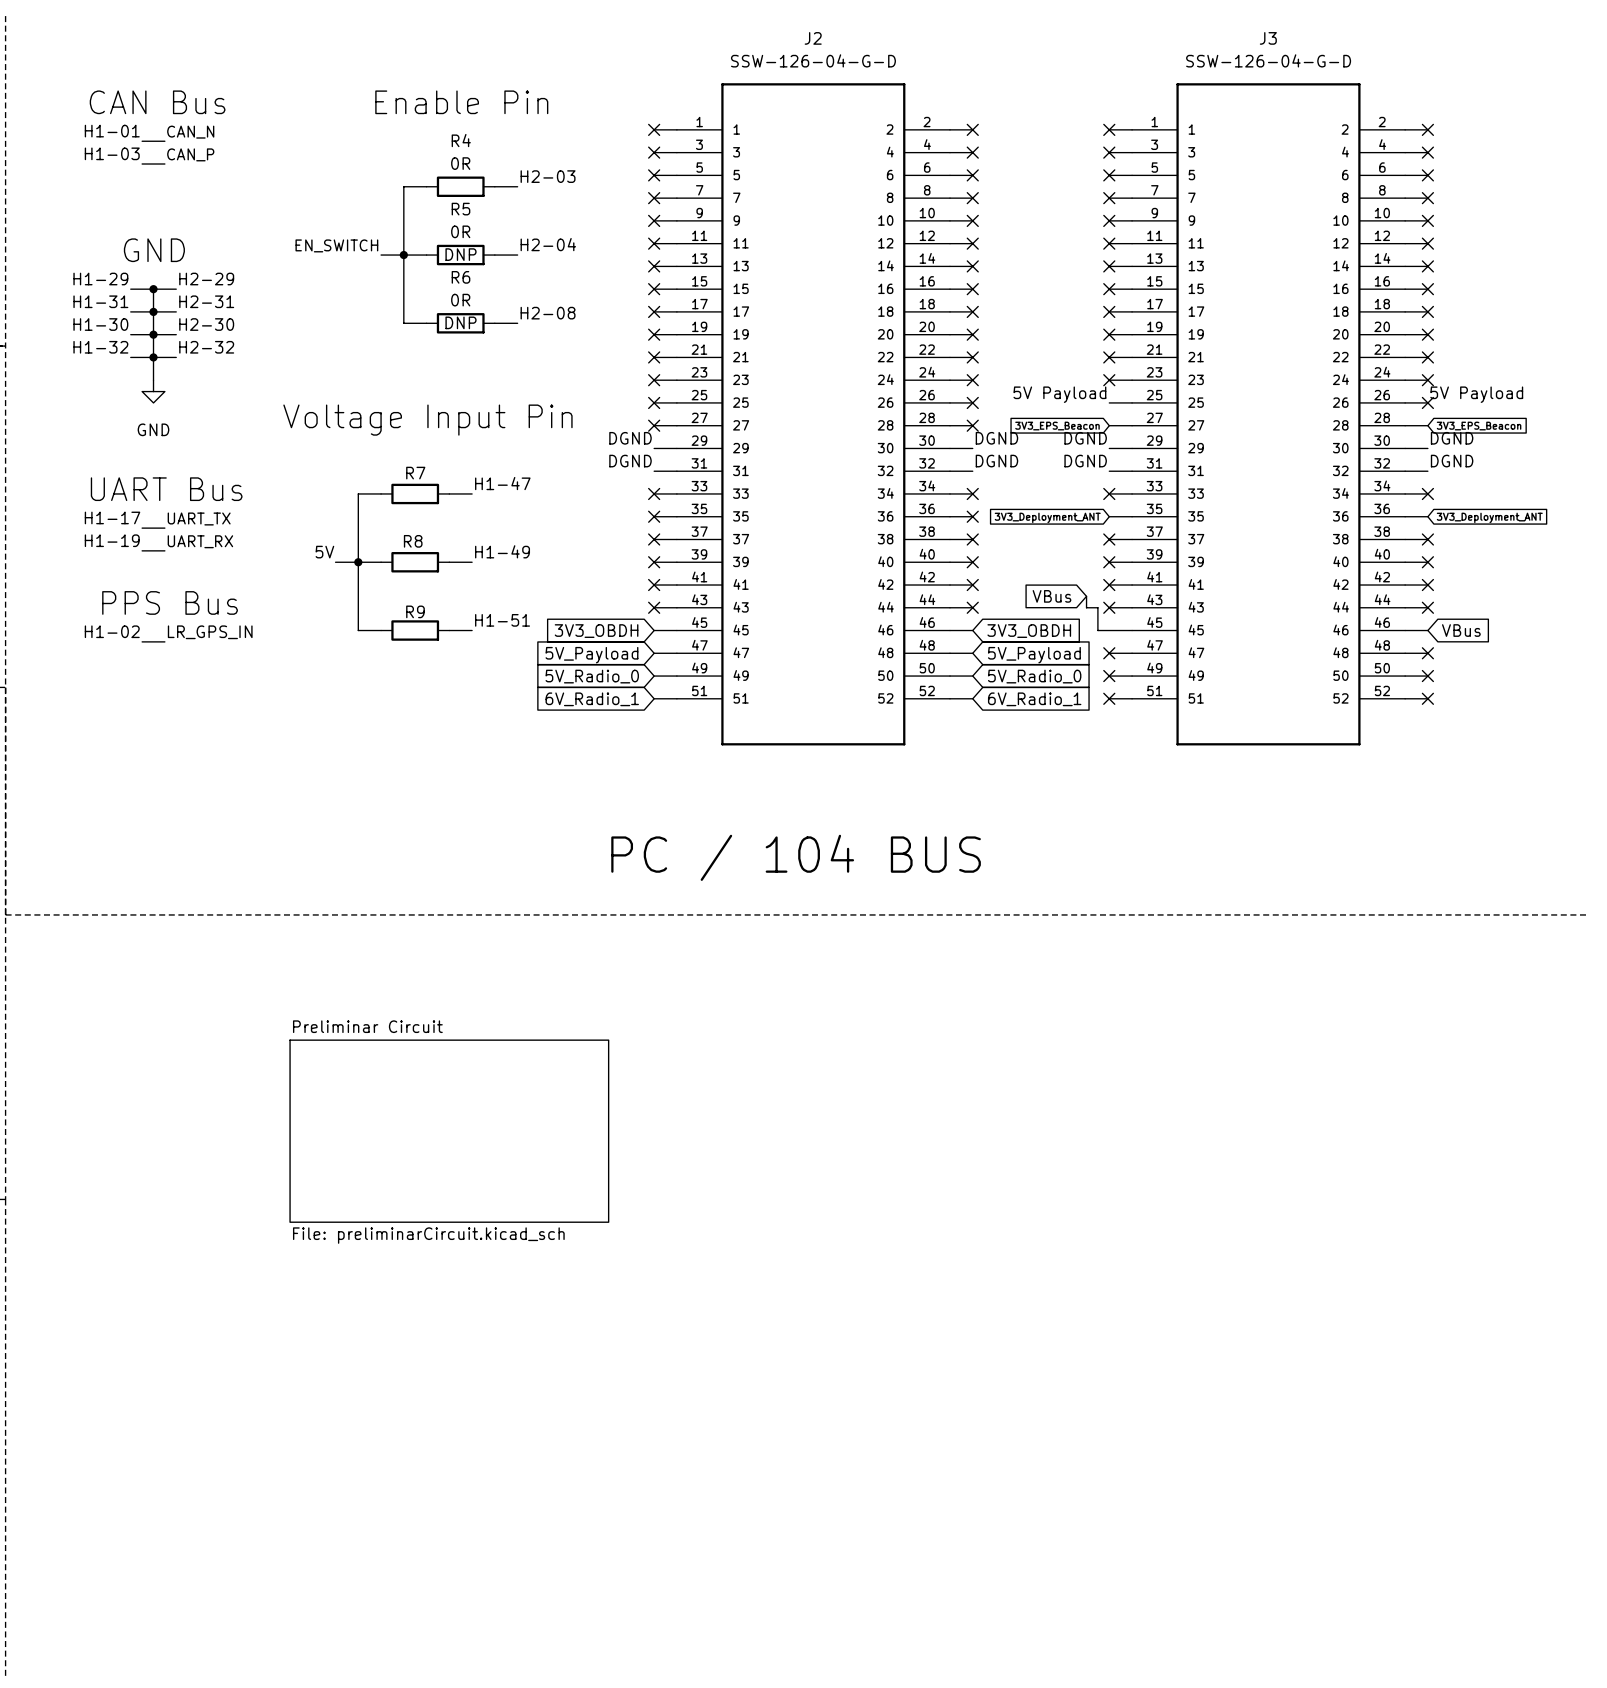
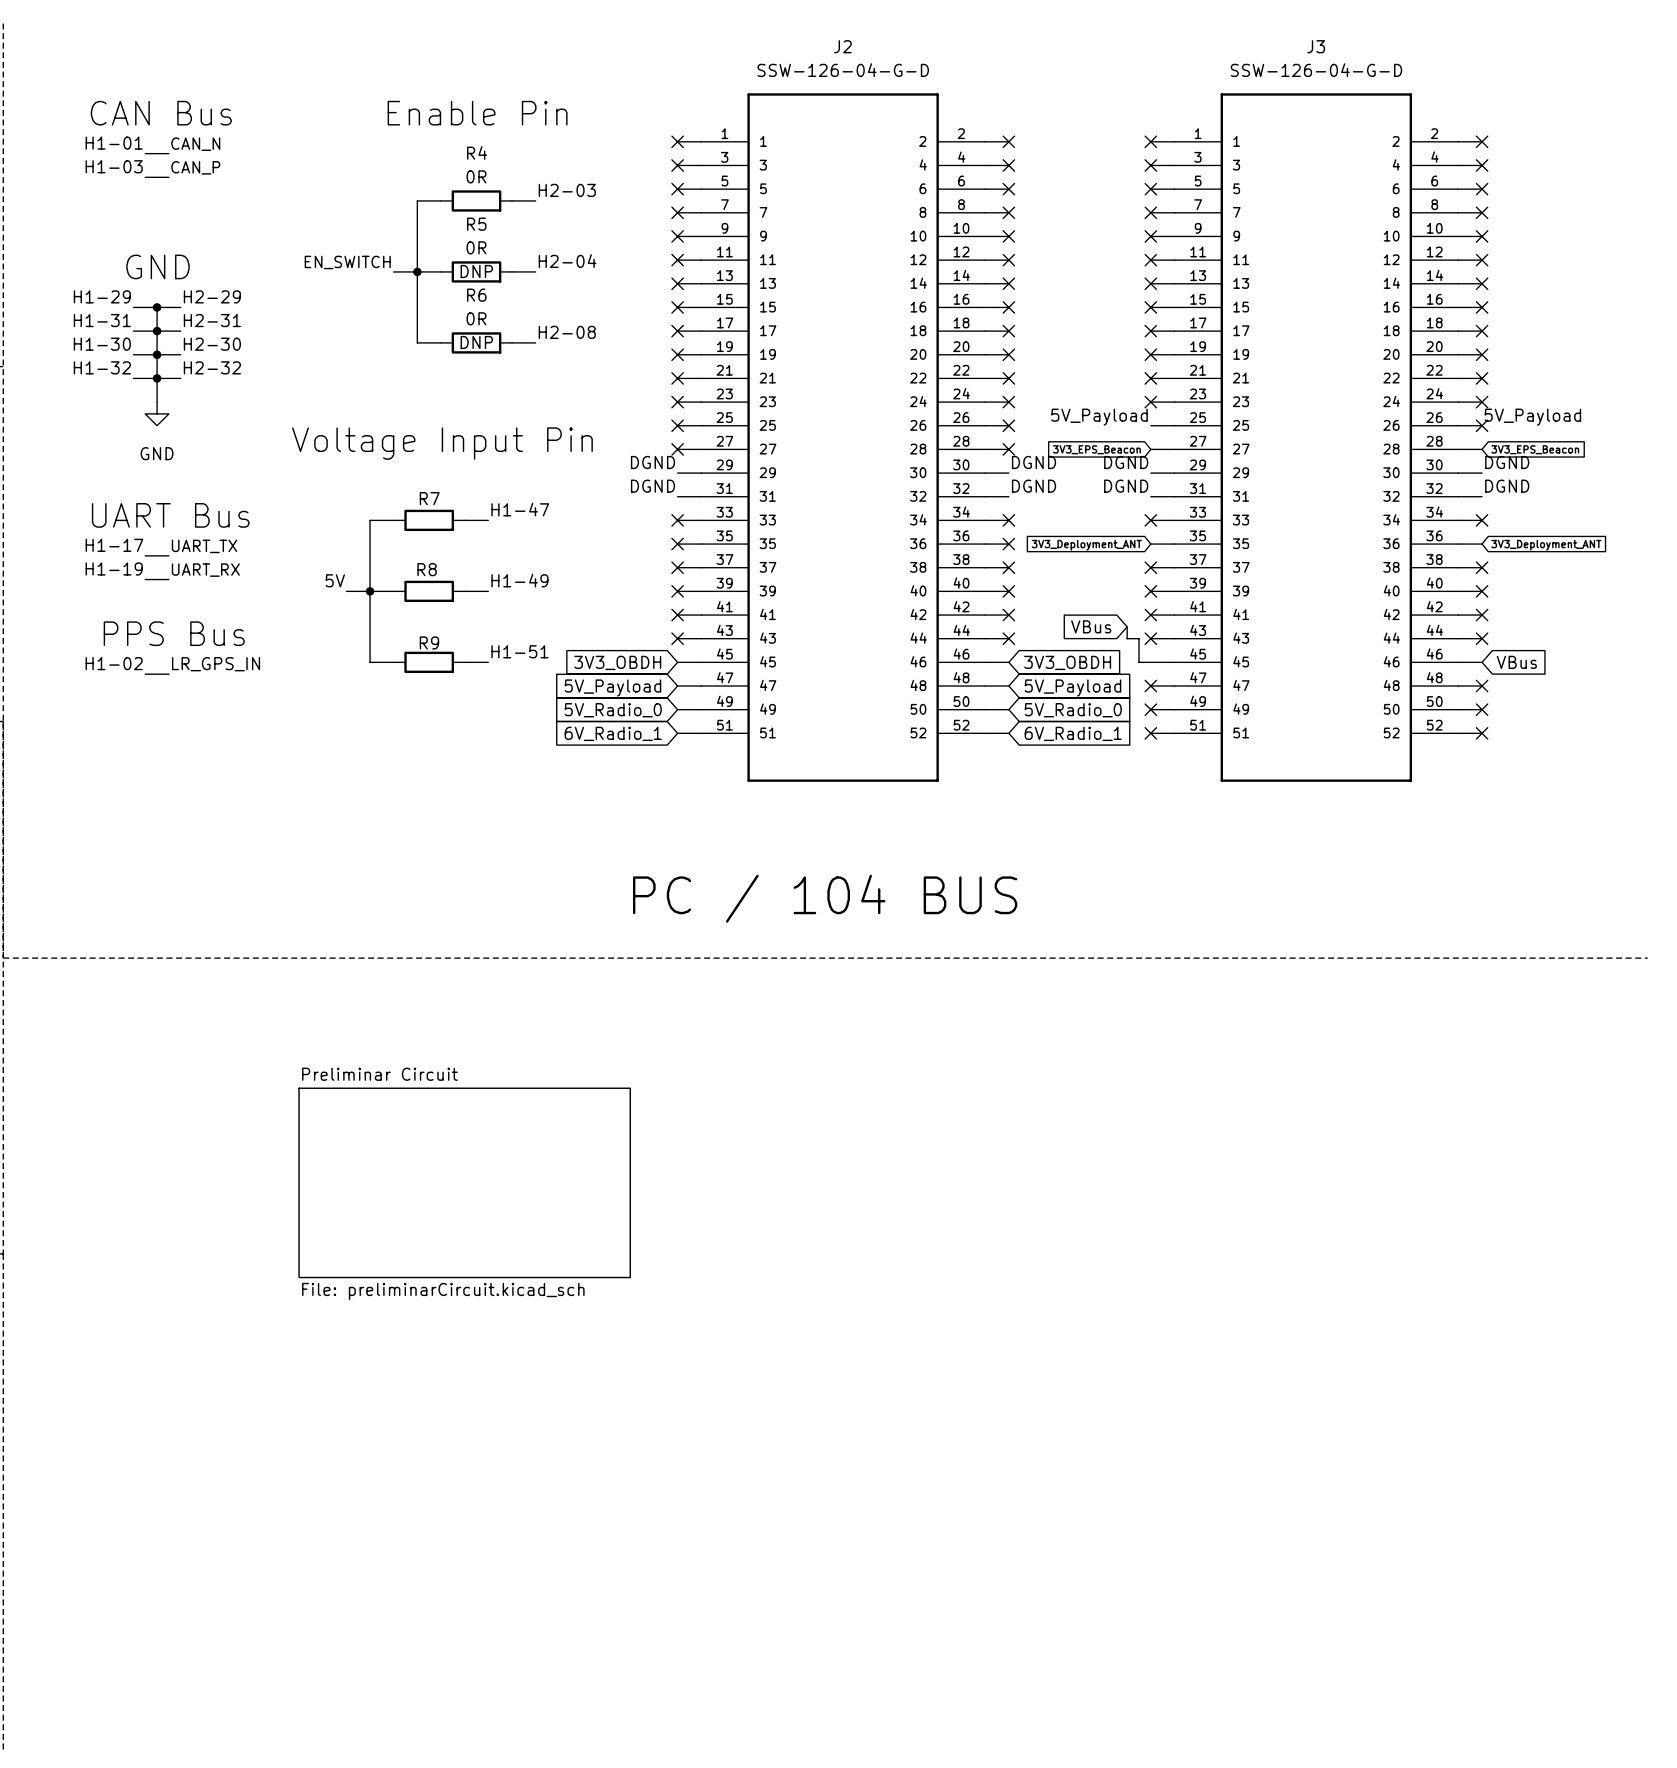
label: 5V Payload (1059, 394) -> 5V_Payload (1099, 417)
label: 5V Payload (1476, 394) -> 5V_Payload (1532, 417)

